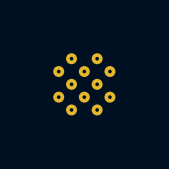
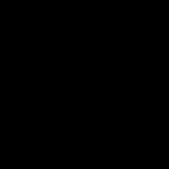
part: (84, 84) -> none

